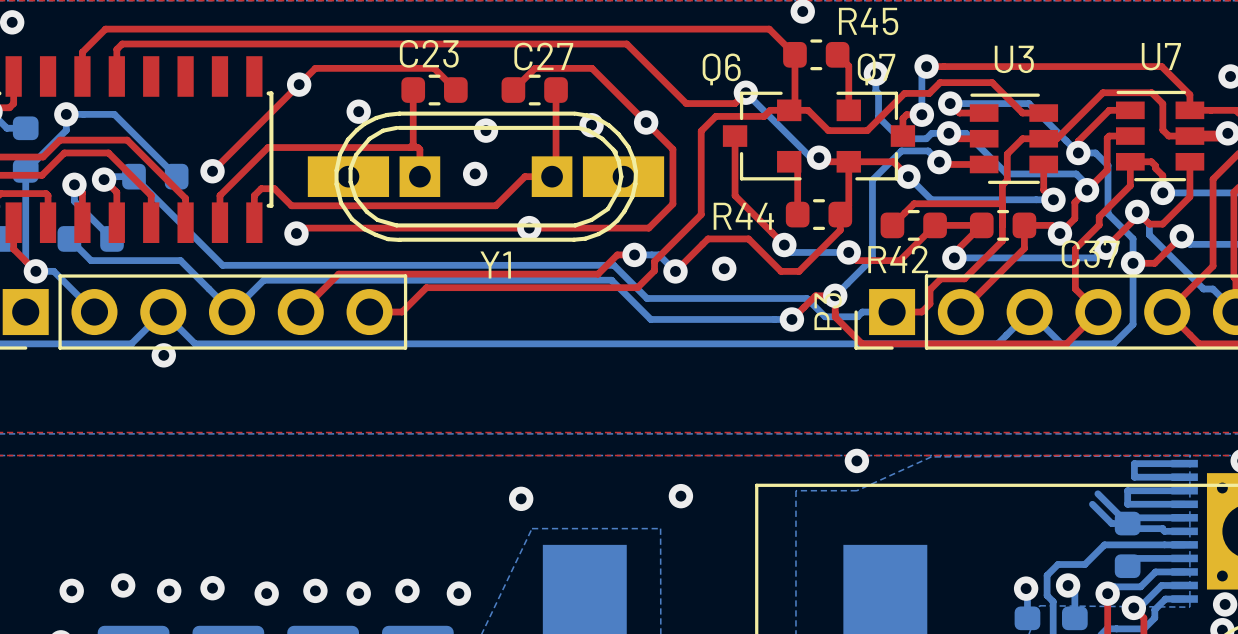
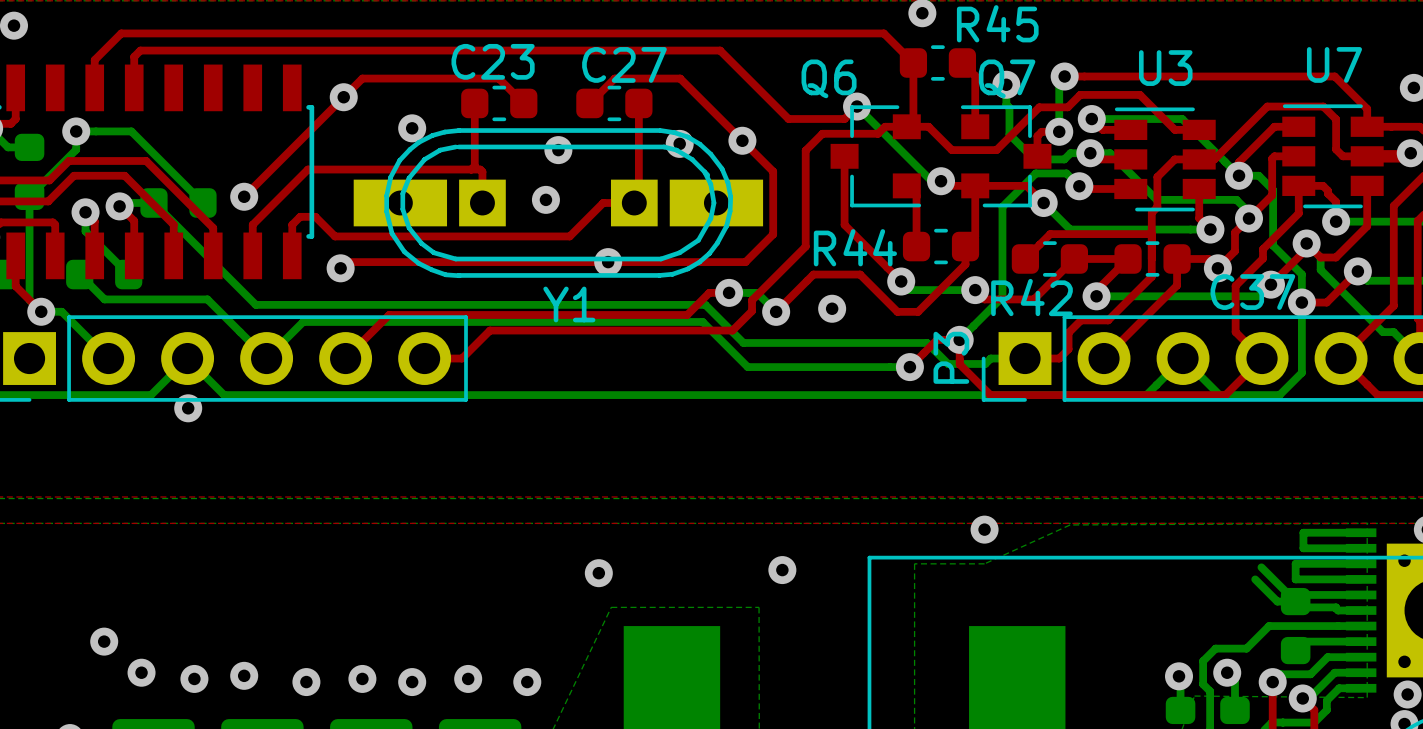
via position: (71, 590) -> (104, 641)

